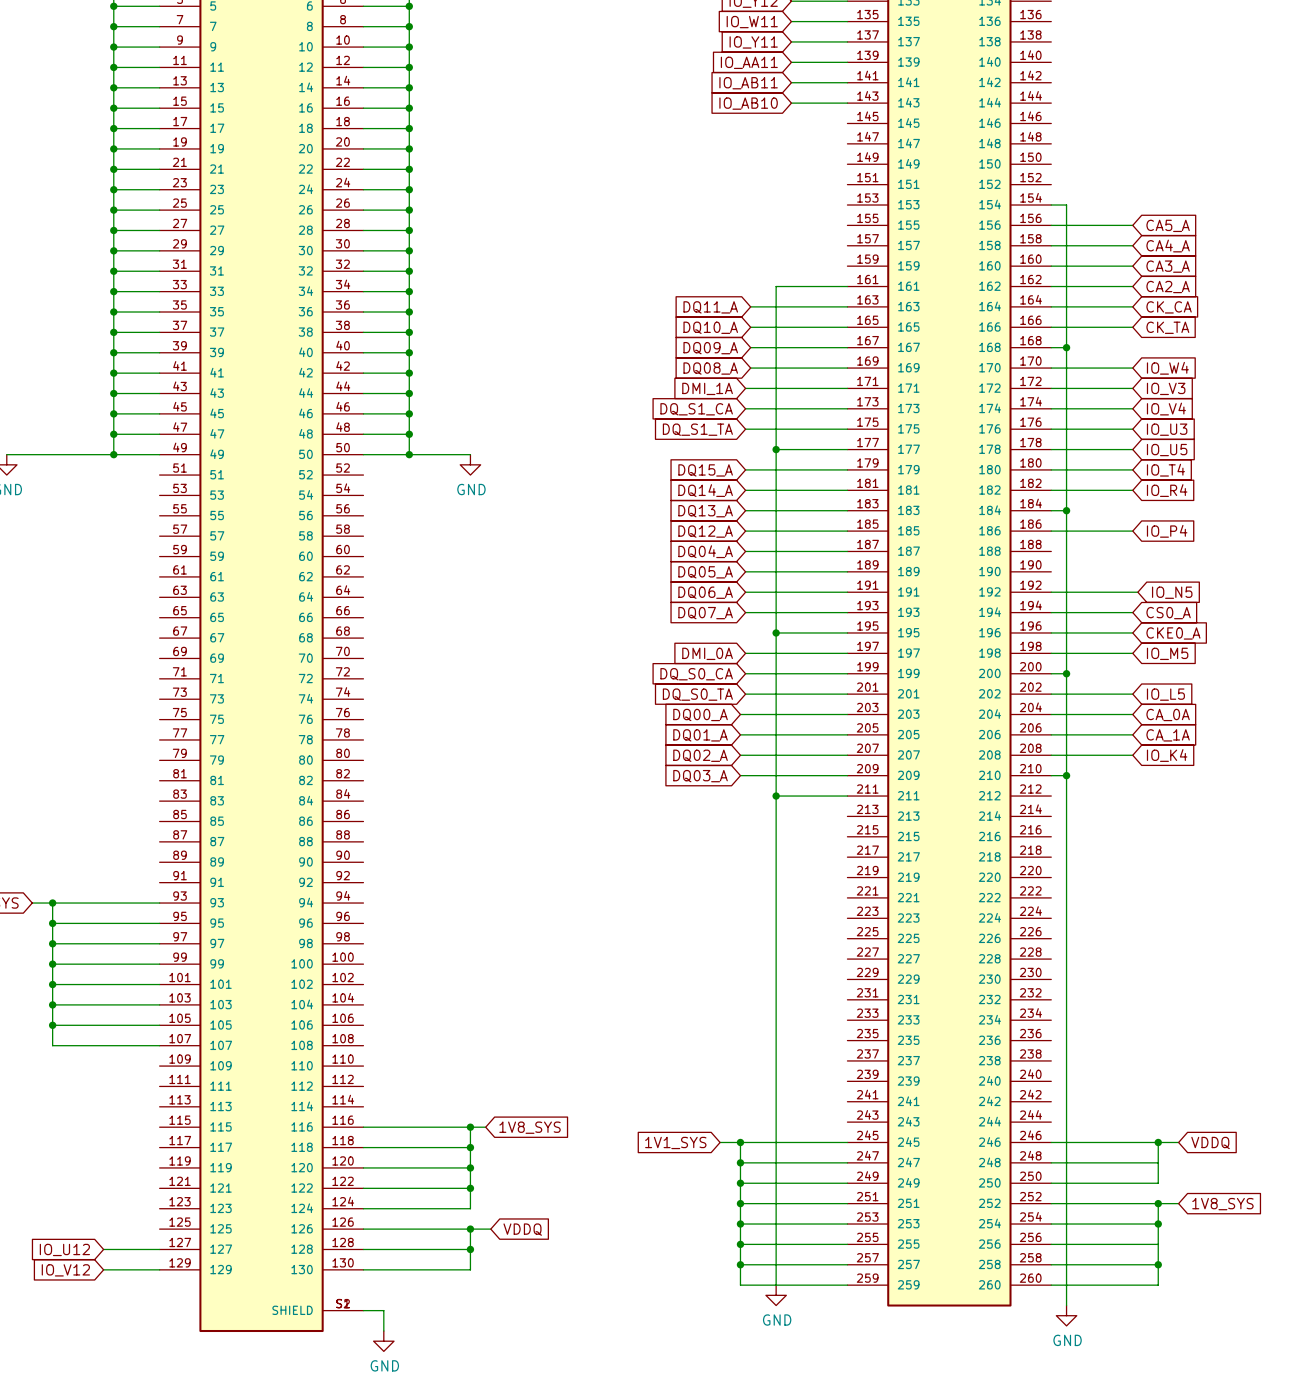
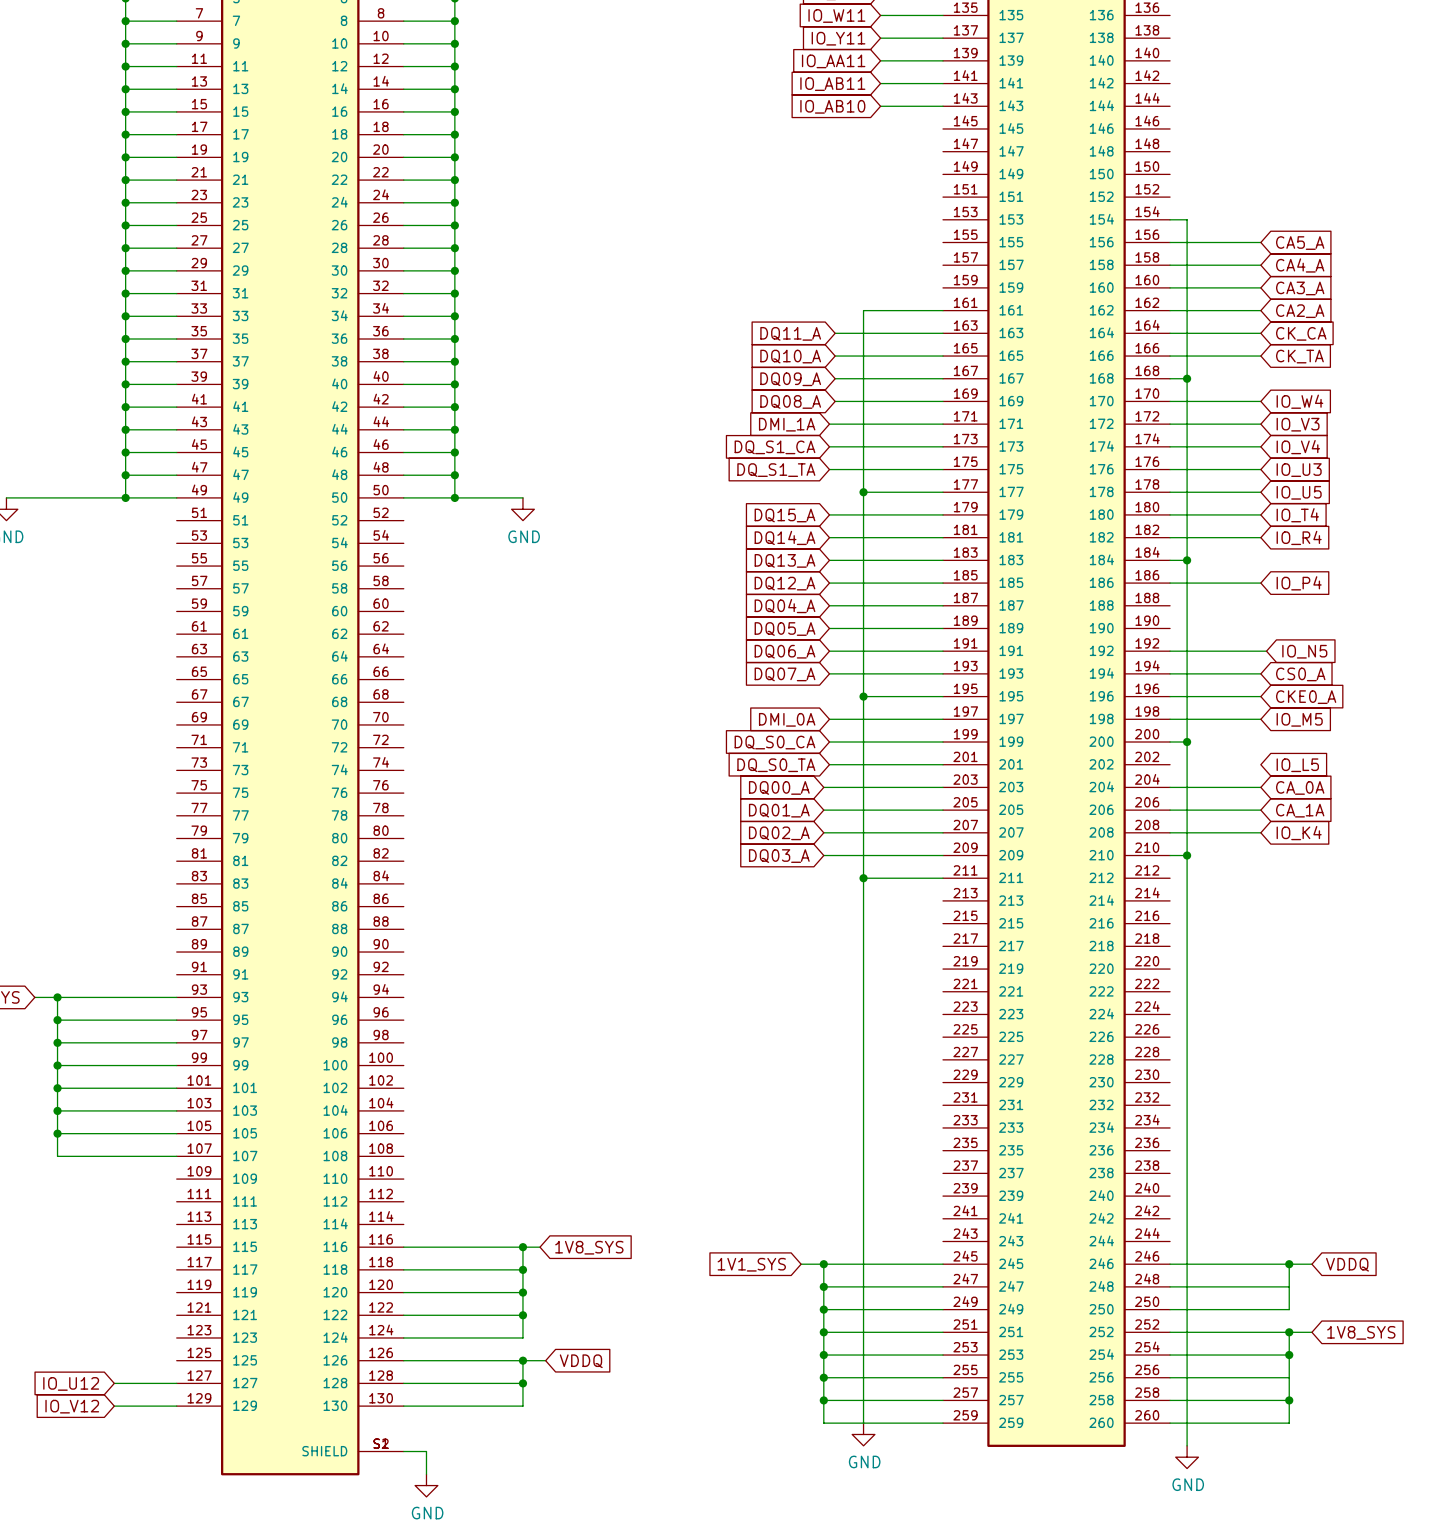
wire: (1051, 694) (1132, 694) -> none

